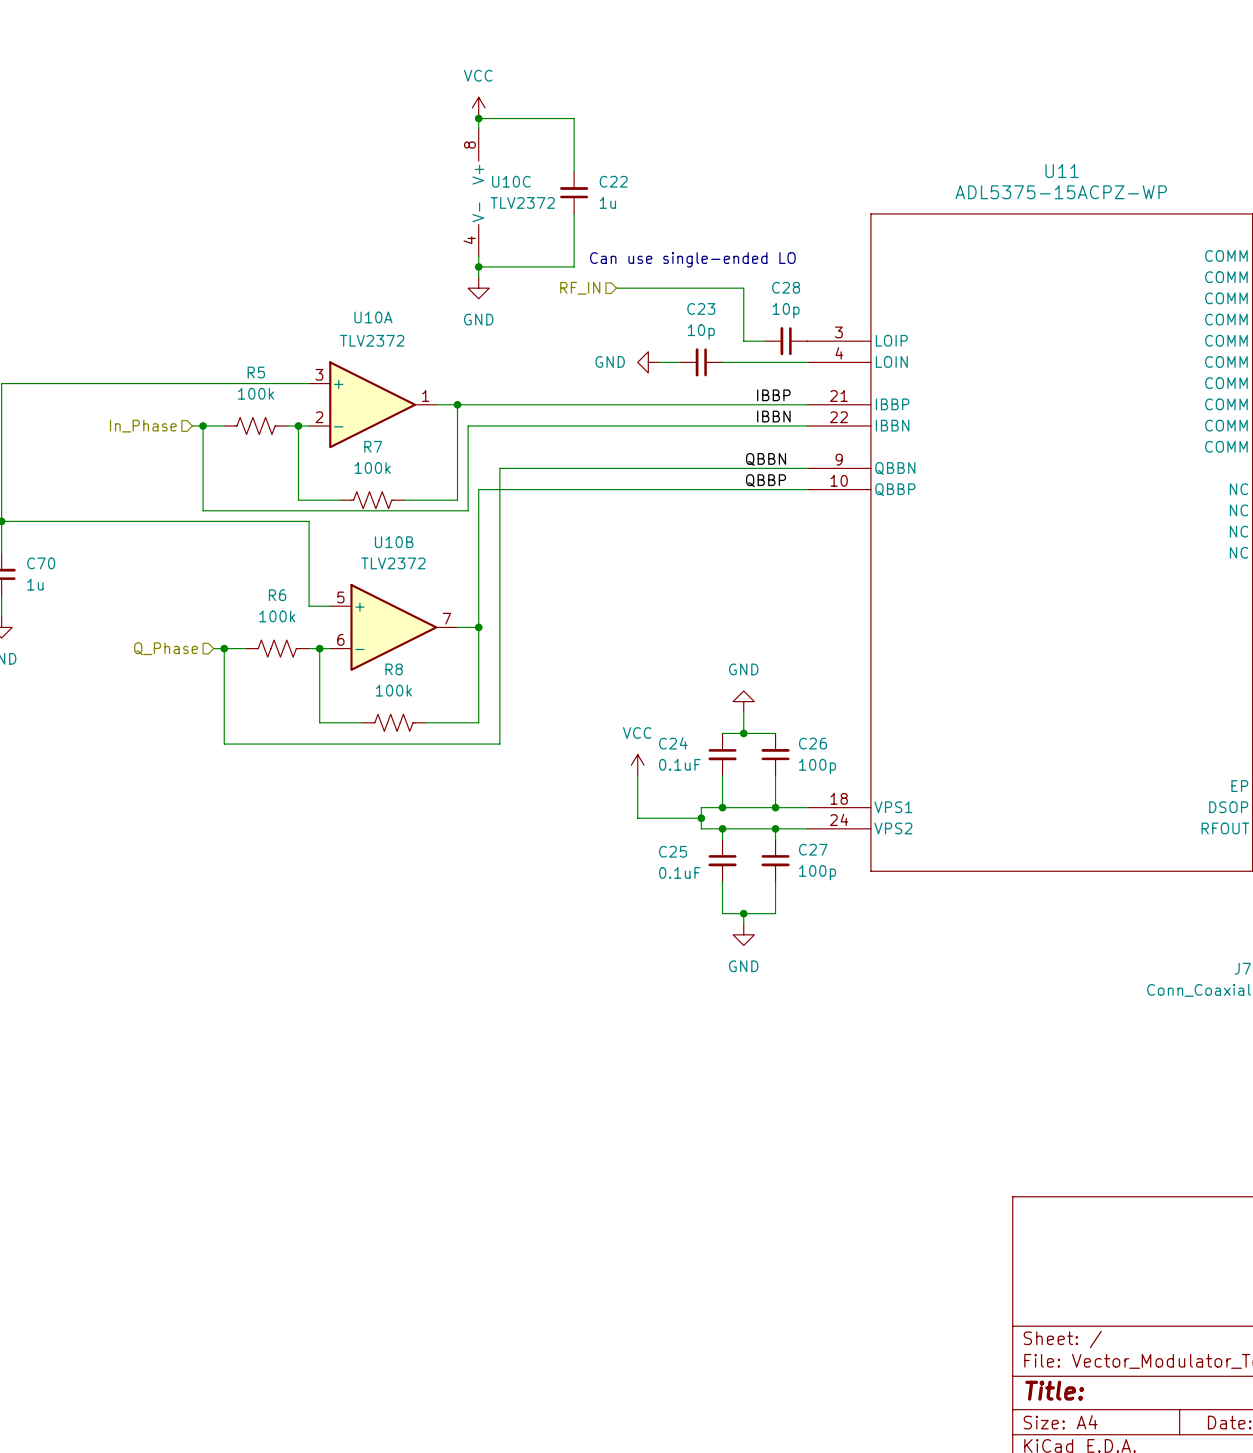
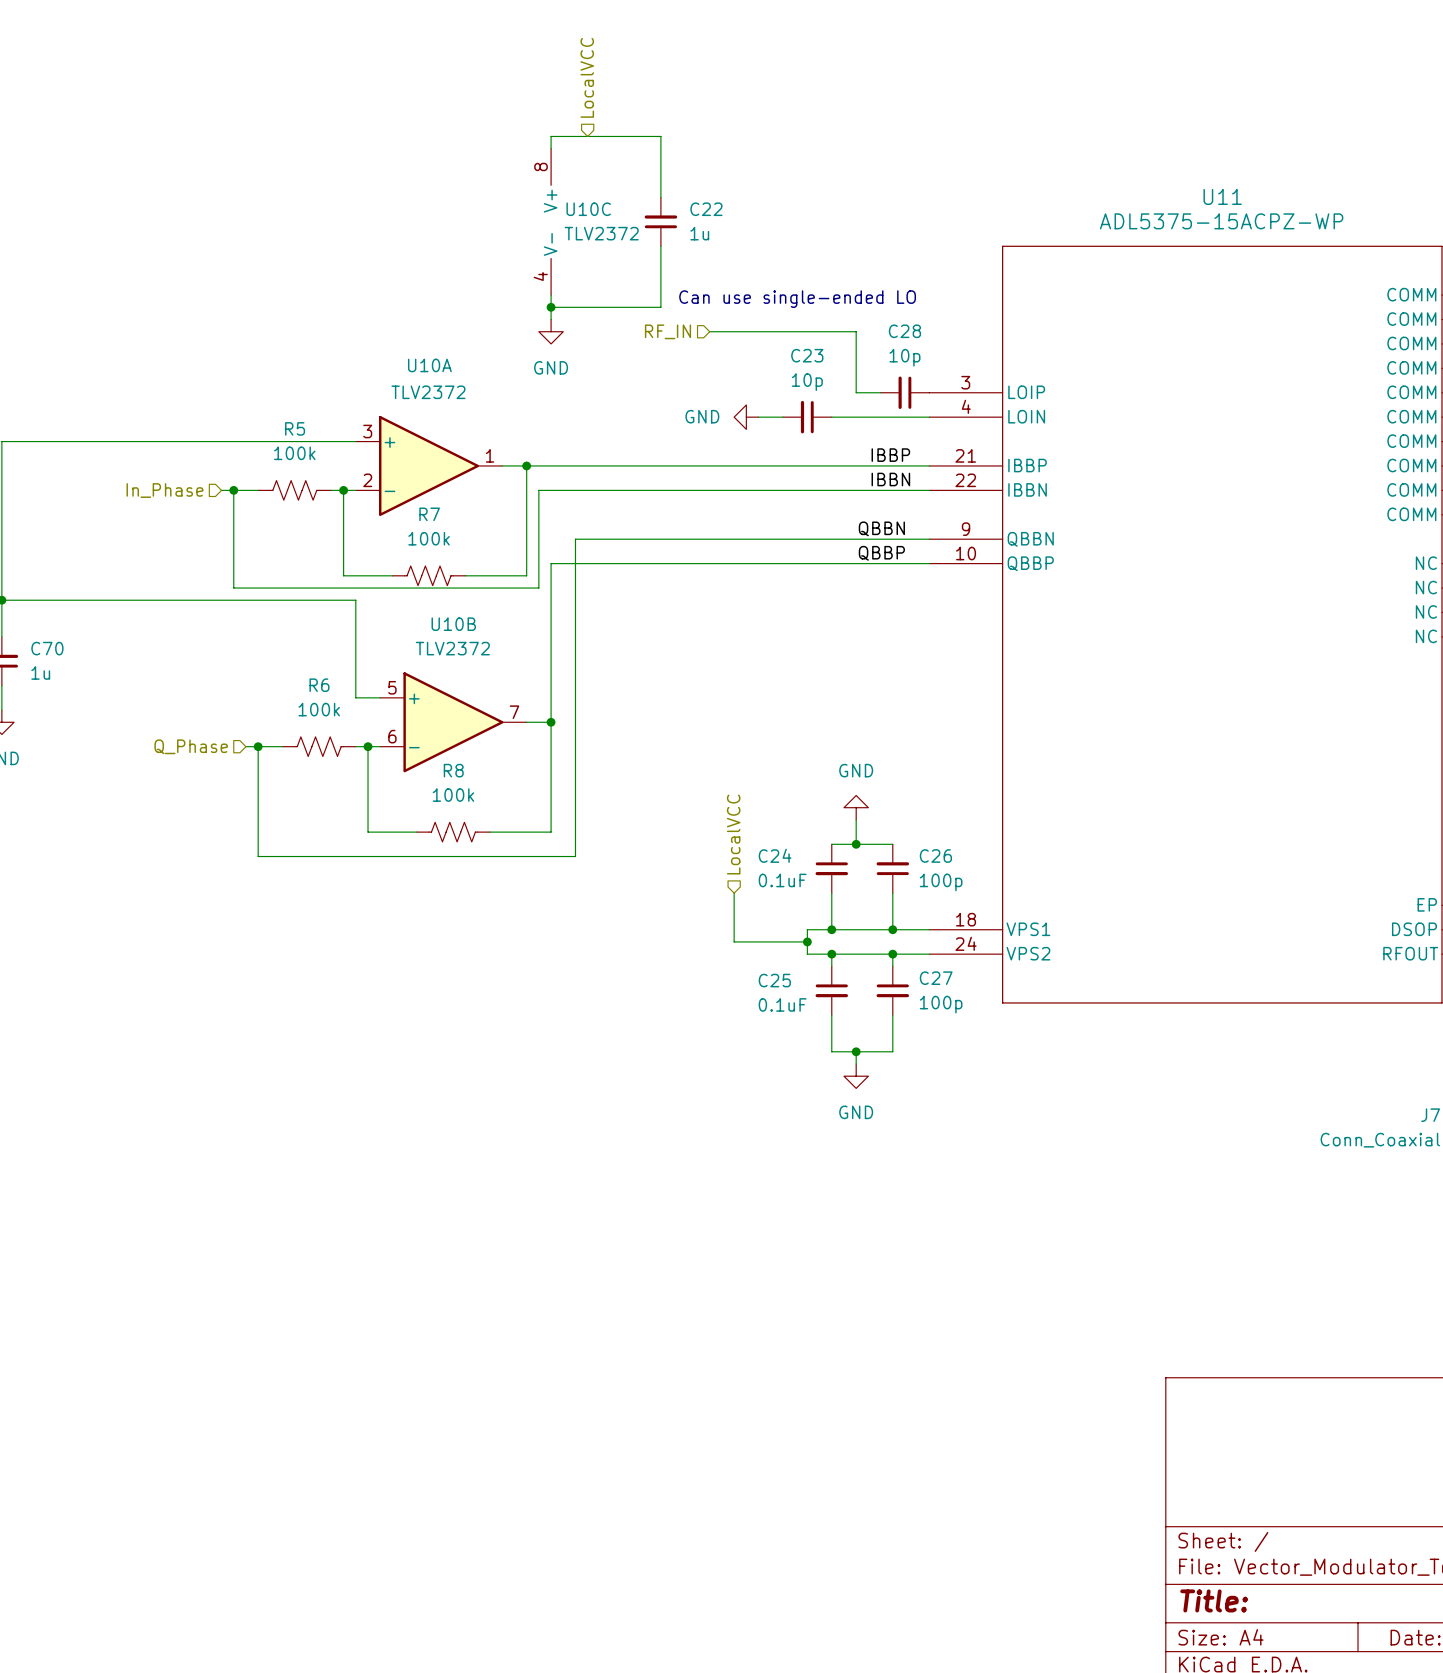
hierarchical label: none -> LocalVCC (587, 77)
power symbol: VCC (478, 107) -> none
junction: (478, 118) -> none
hierarchical label: none -> LocalVCC (733, 834)
power symbol: VCC (637, 765) -> none

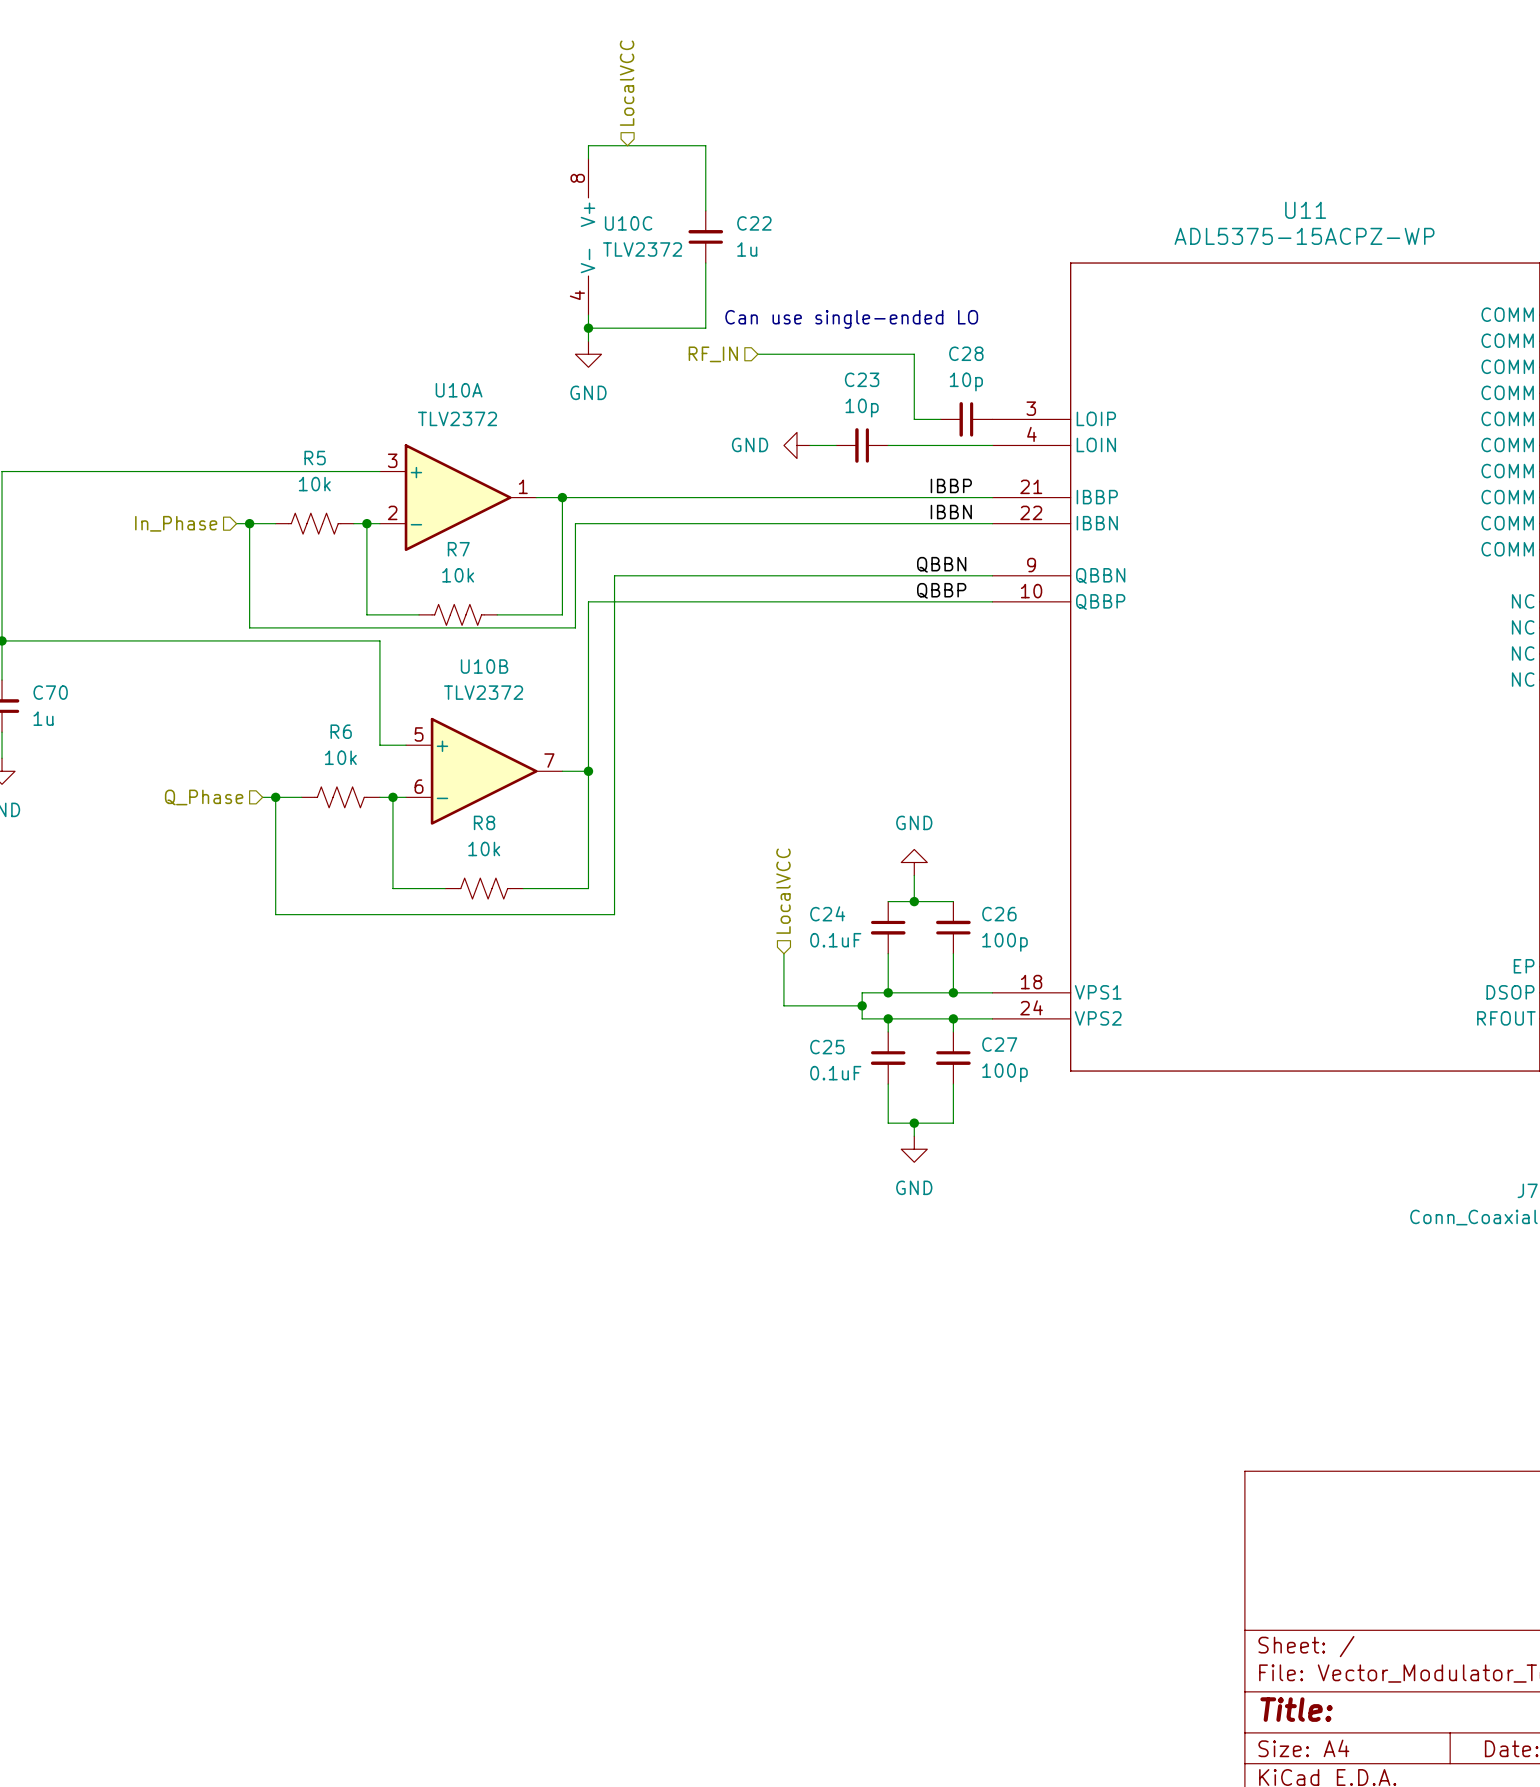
R5 value: 100k (294, 453) -> 10k (314, 484)
R7 value: 100k (429, 538) -> 10k (458, 575)
R6 value: 100k (319, 709) -> 10k (340, 757)
R8 value: 100k (453, 795) -> 10k (484, 848)

